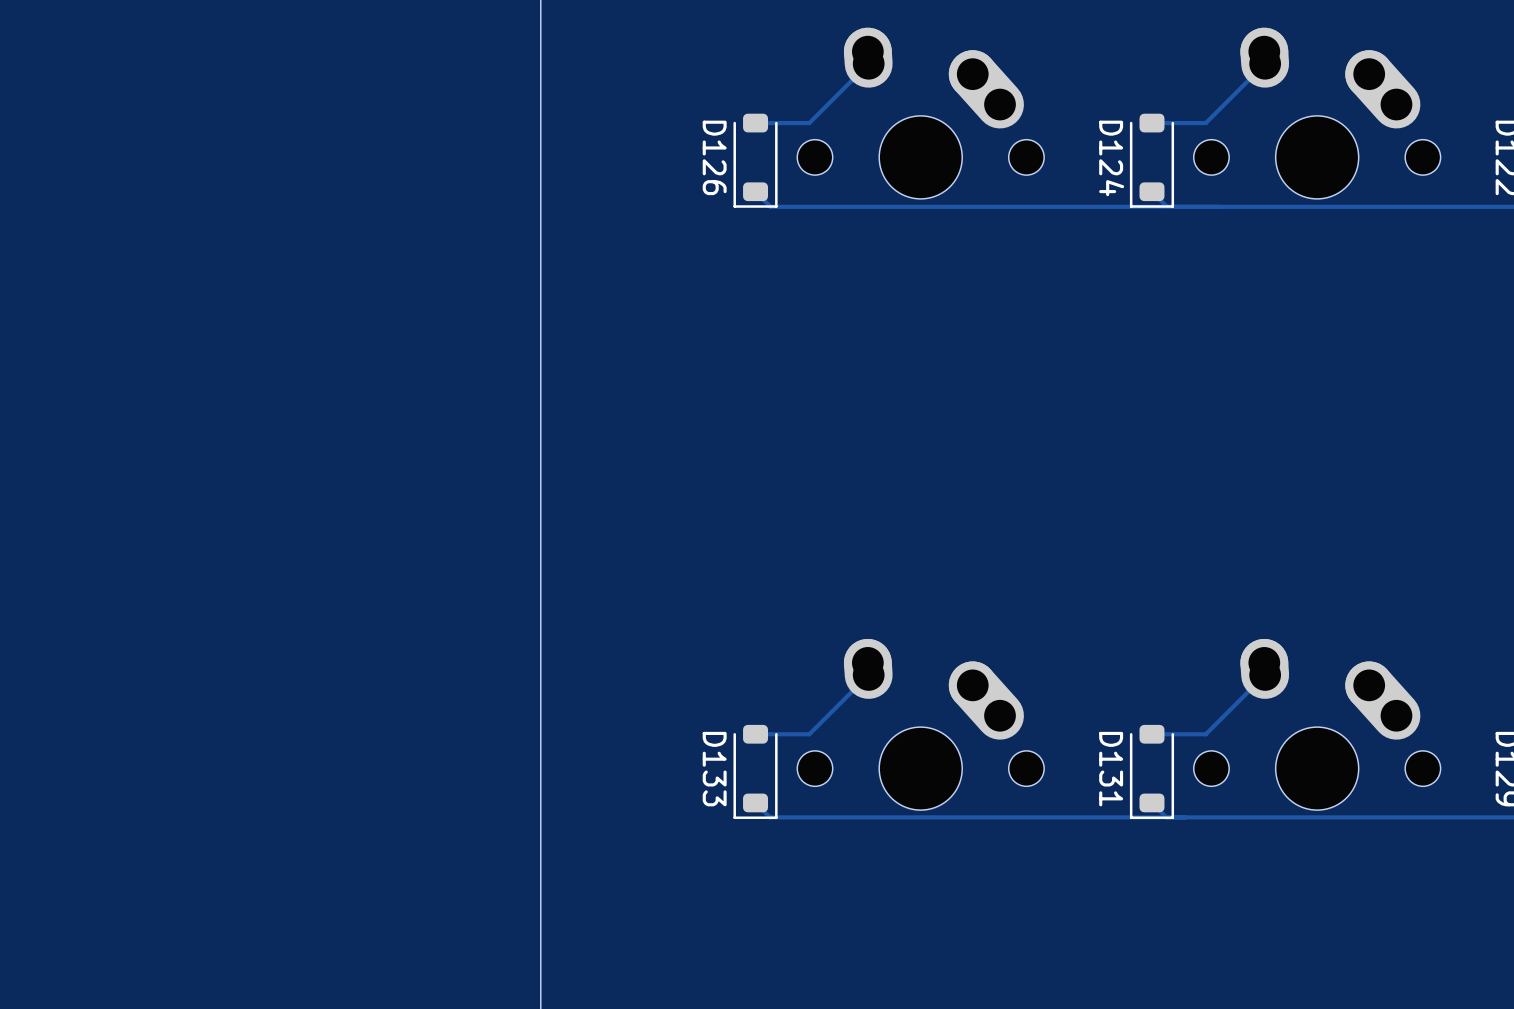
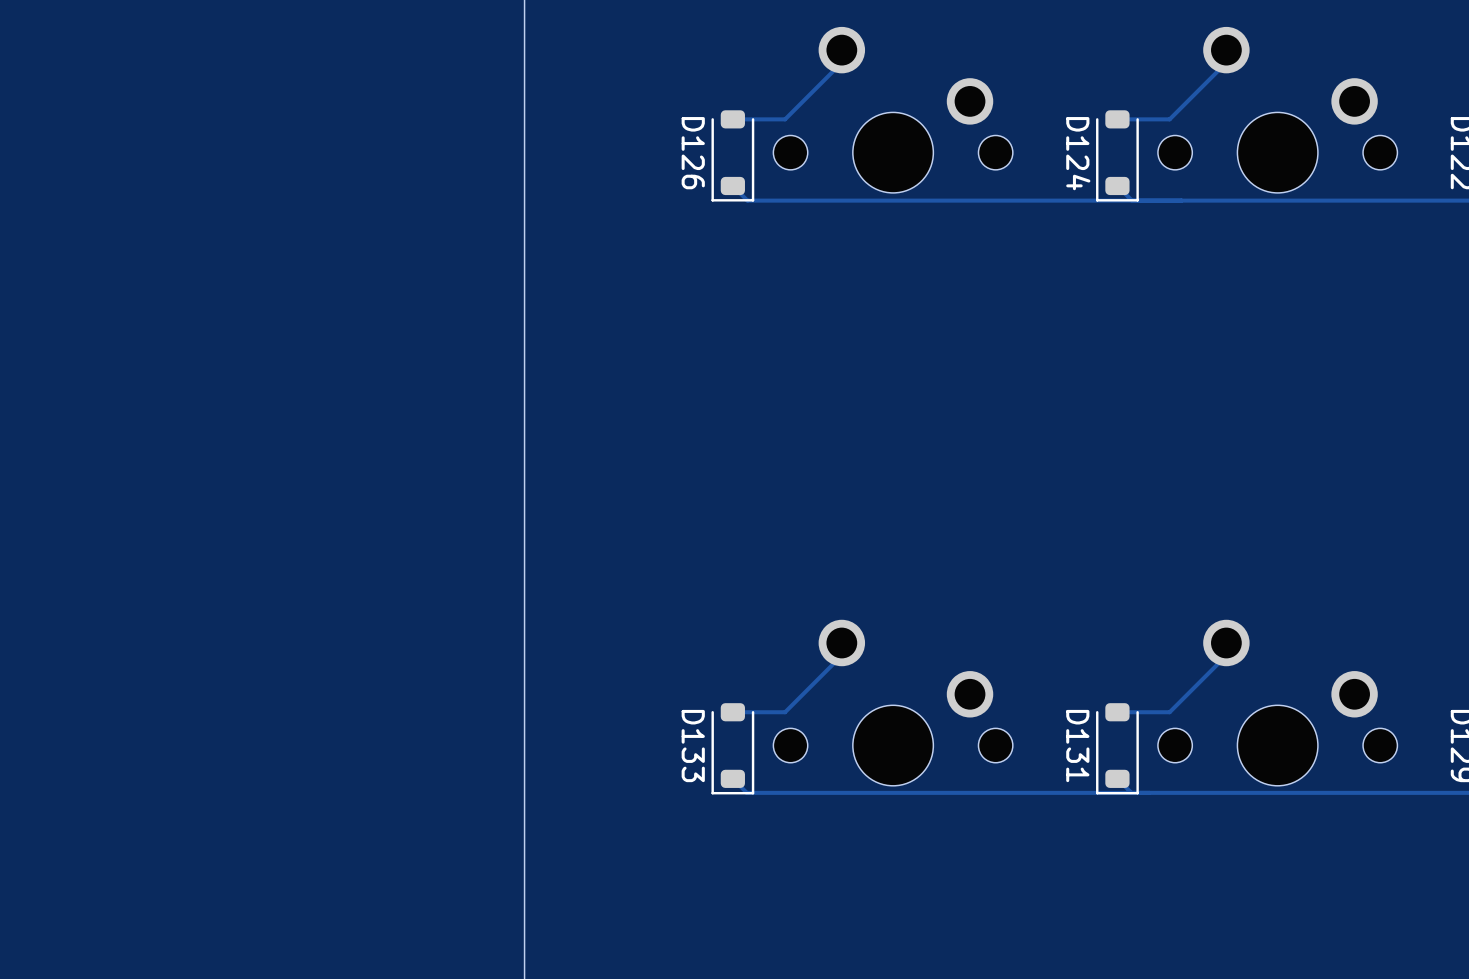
part footprint: [797, 27, 1045, 199] -> [773, 26, 1013, 193]
part footprint: [1193, 27, 1441, 199] -> [1157, 26, 1398, 193]
part footprint: [797, 638, 1045, 811] -> [773, 619, 1013, 786]
part footprint: [1193, 638, 1441, 811] -> [1157, 619, 1398, 786]

